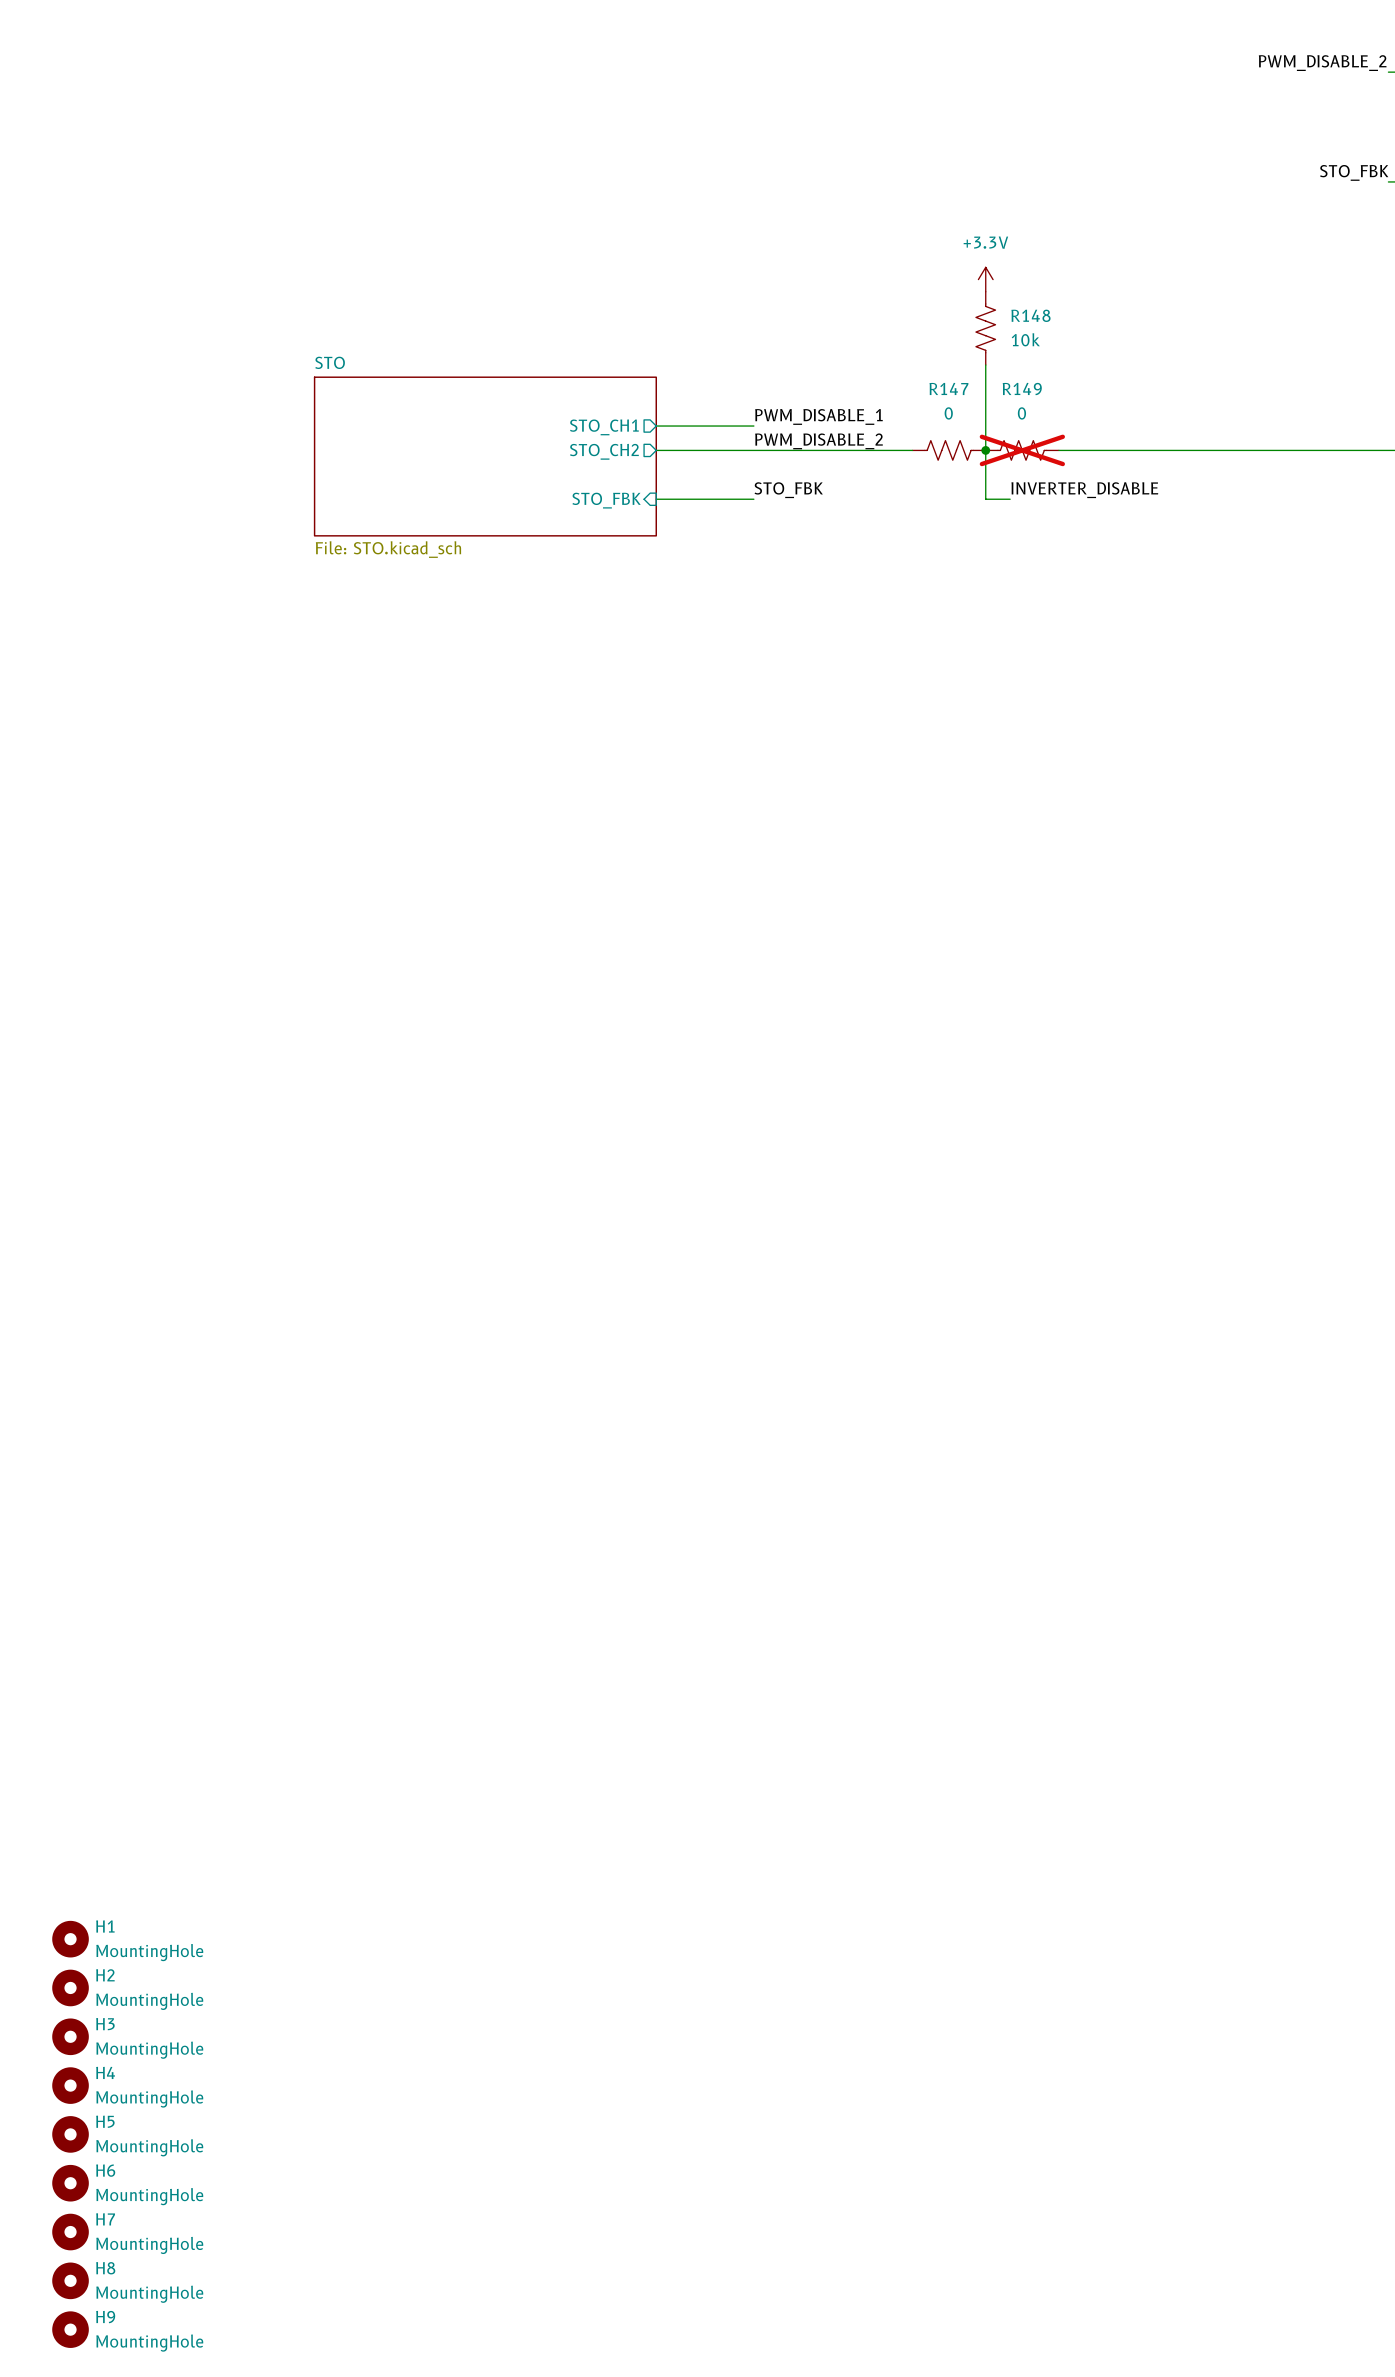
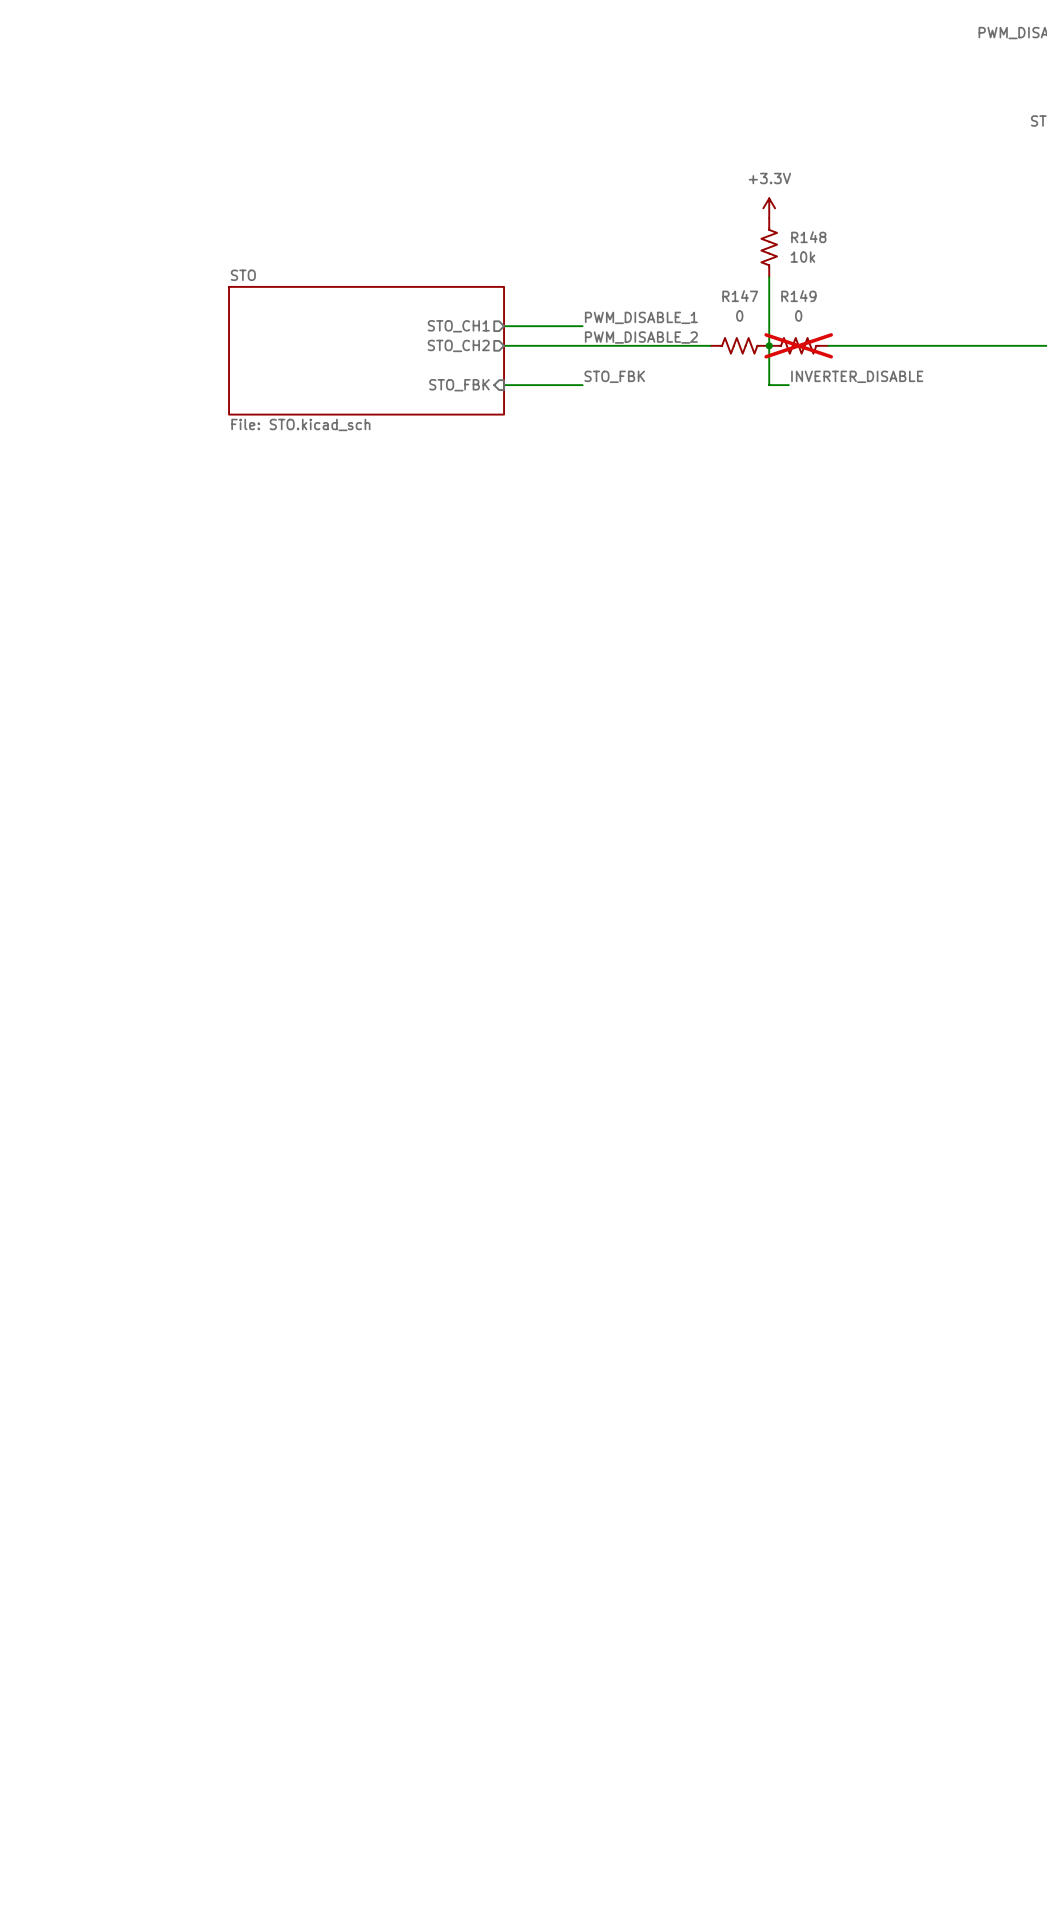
H1: MountingHole (70, 1939) -> none
H2: MountingHole (70, 1987) -> none
H3: MountingHole (70, 2036) -> none
H4: MountingHole (70, 2085) -> none
H5: MountingHole (70, 2134) -> none
H6: MountingHole (70, 2183) -> none
H7: MountingHole (70, 2232) -> none
H8: MountingHole (70, 2280) -> none
H9: MountingHole (70, 2329) -> none

